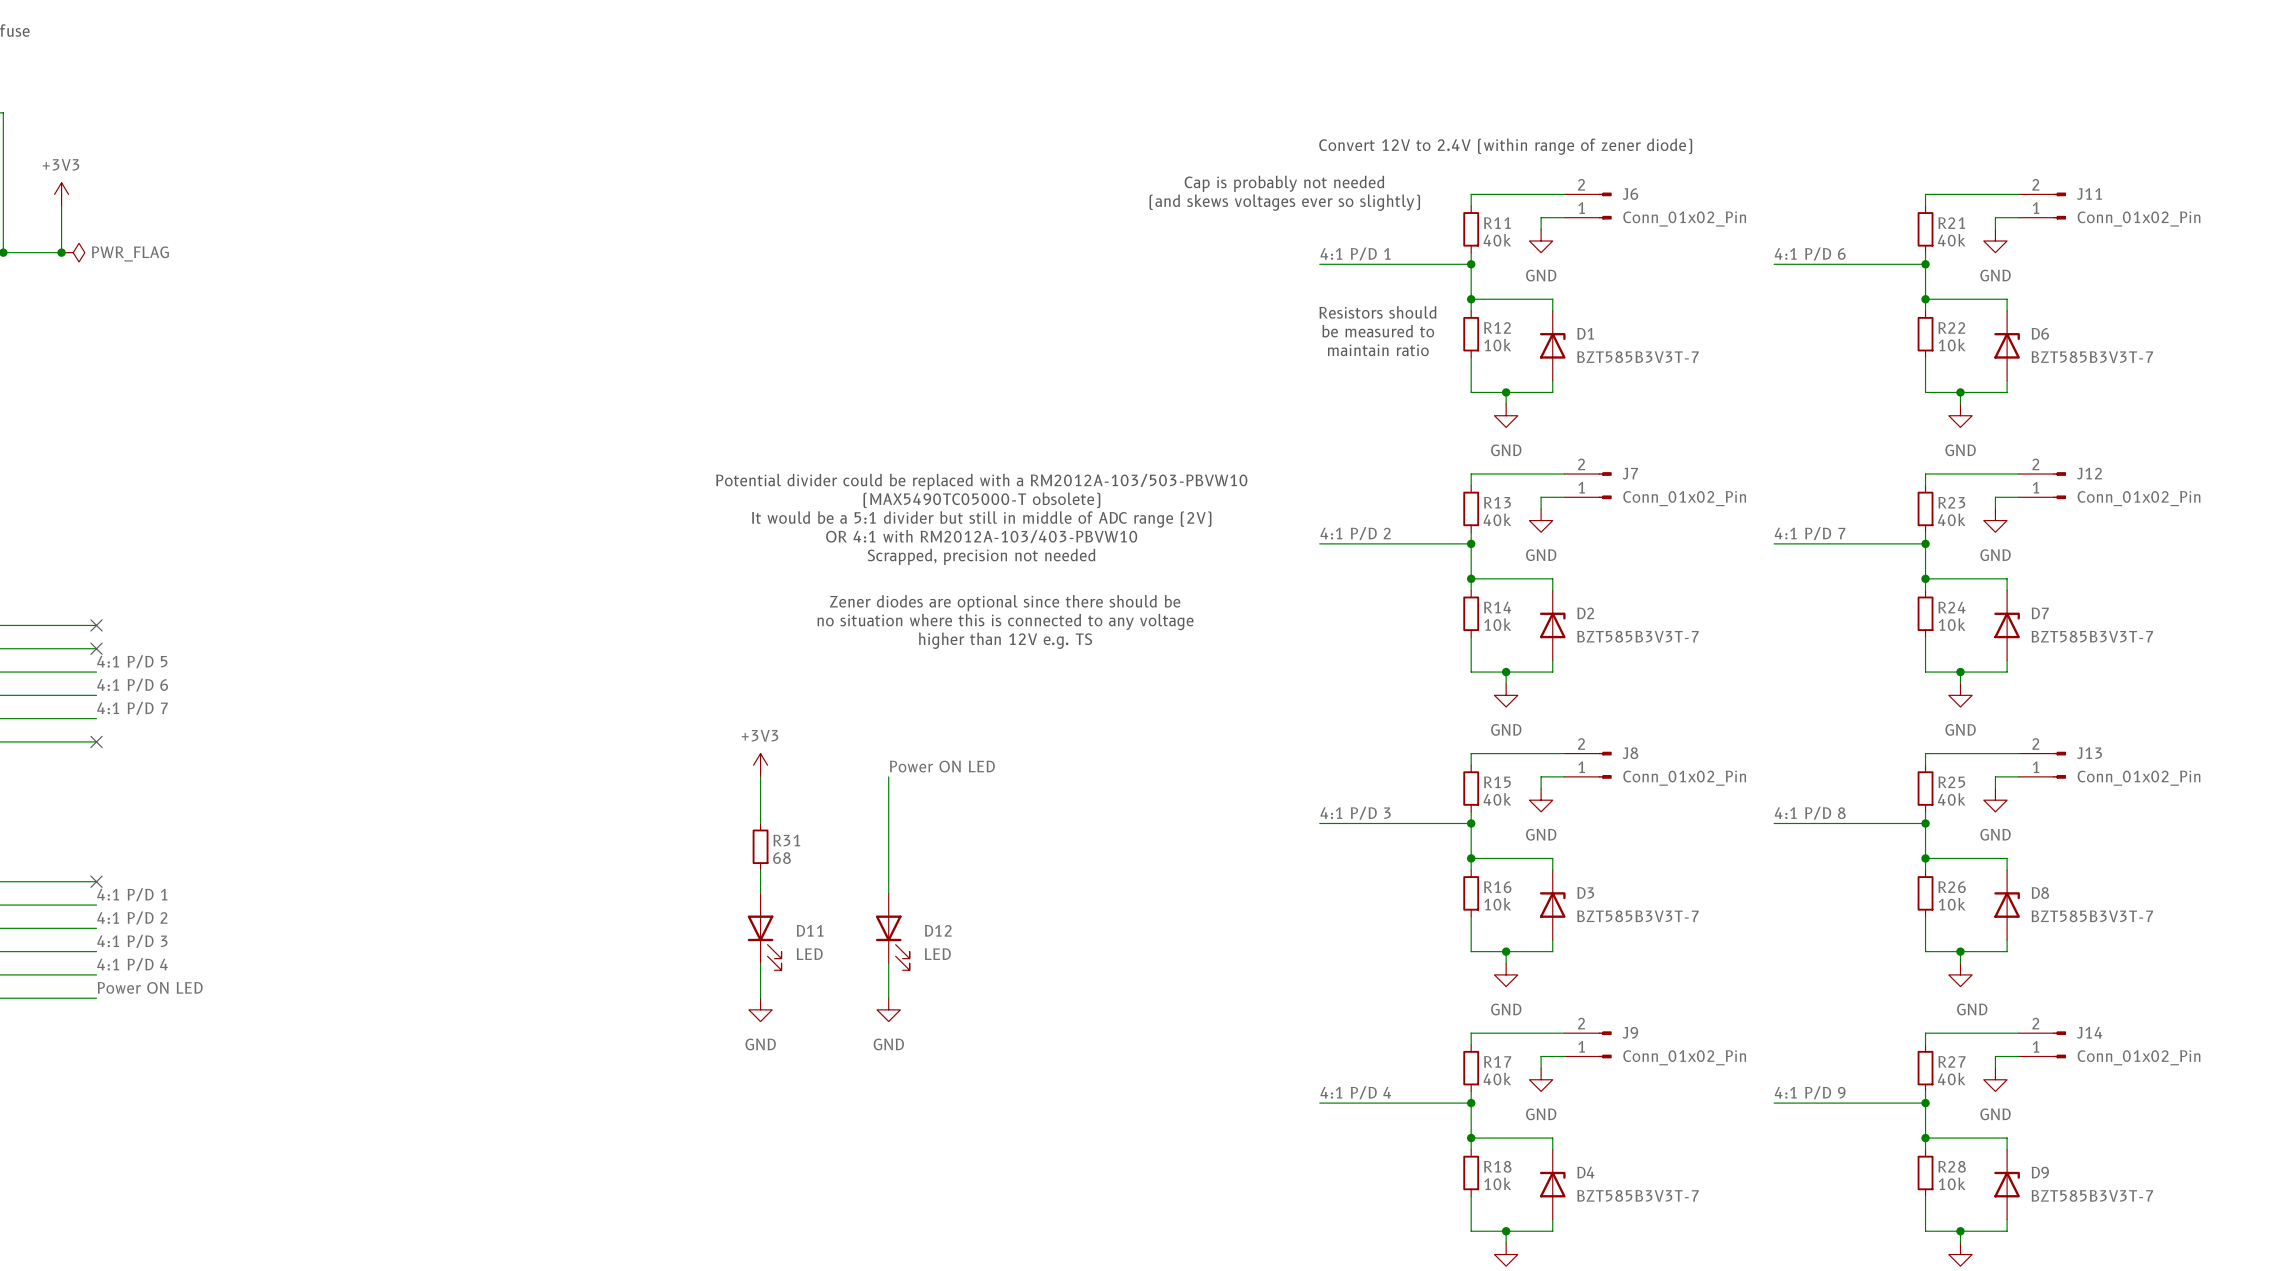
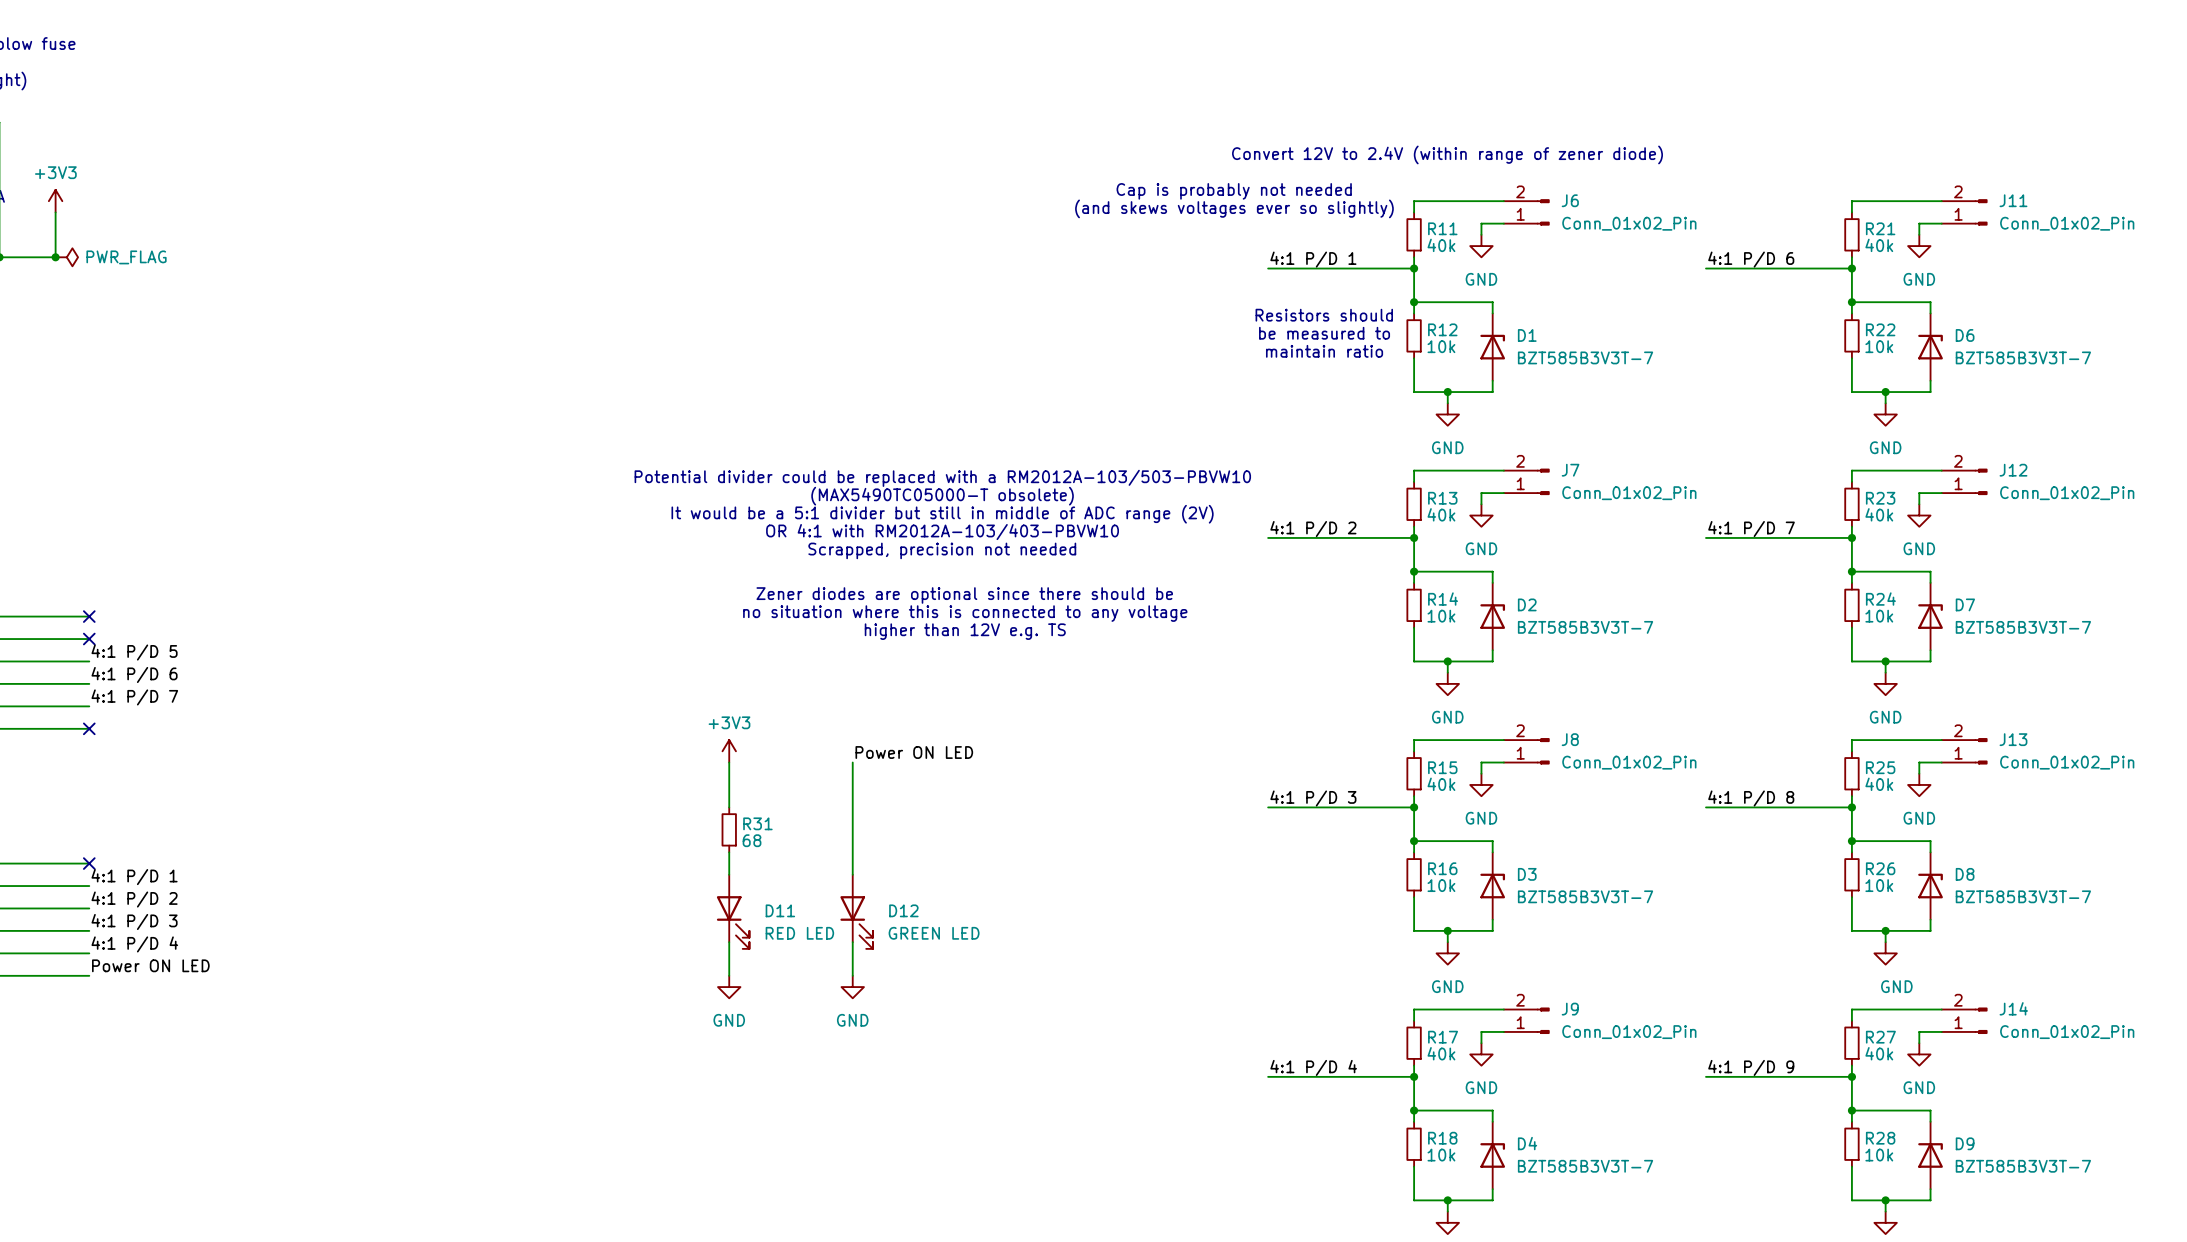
D11 value: LED (809, 954) -> RED LED (799, 933)
D12 value: LED (937, 954) -> GREEN LED (934, 933)

